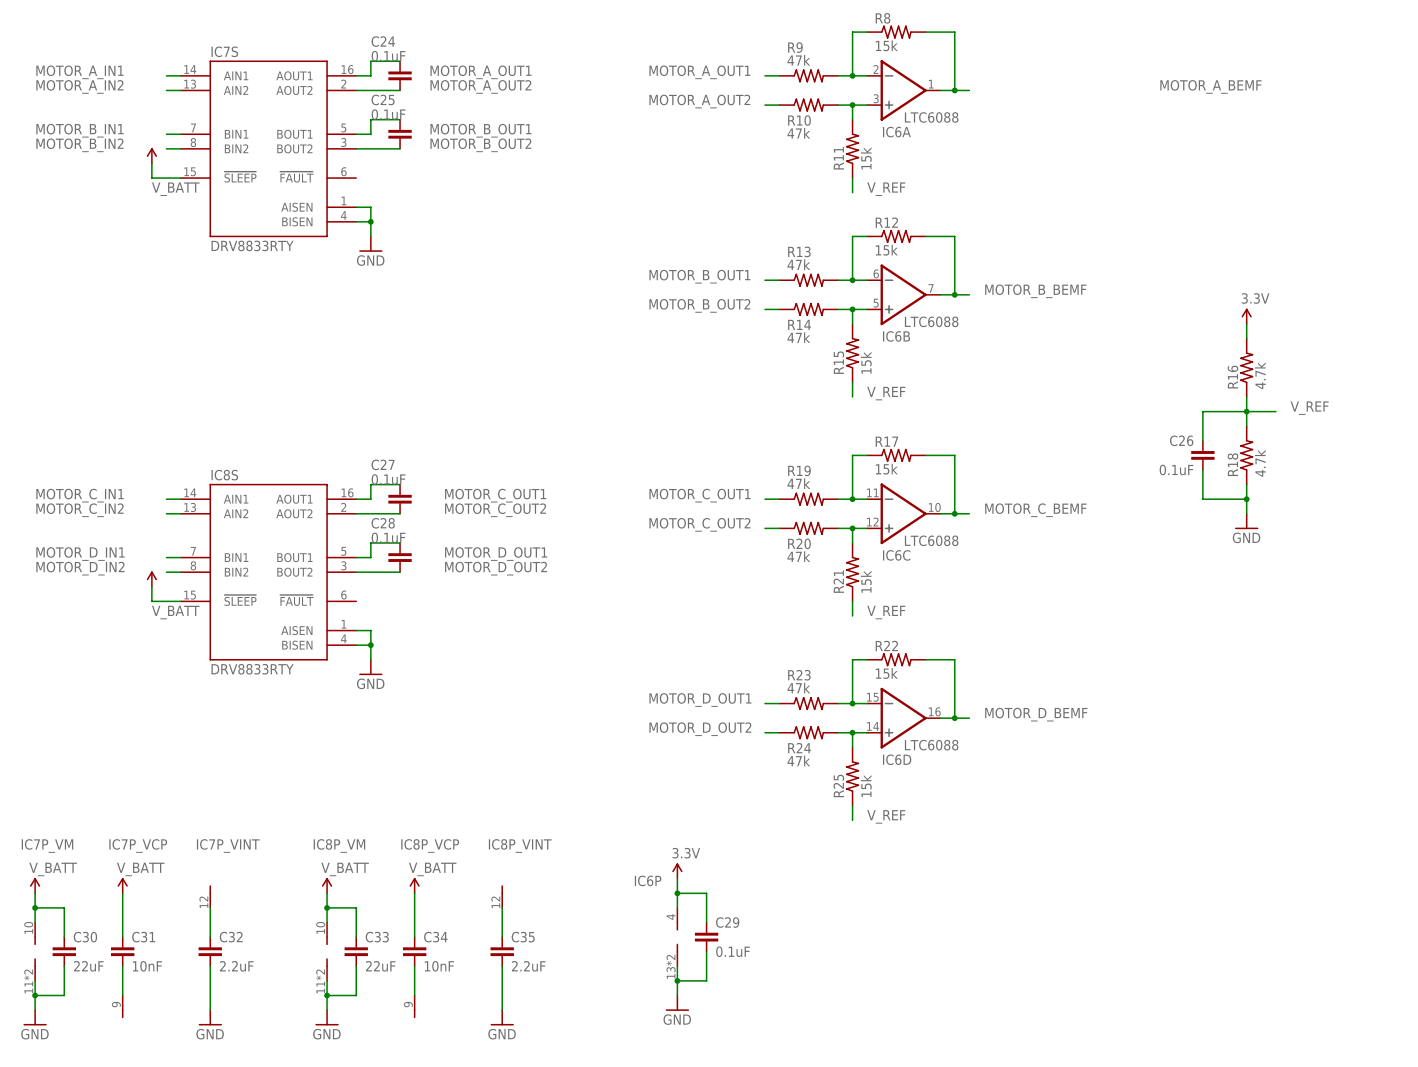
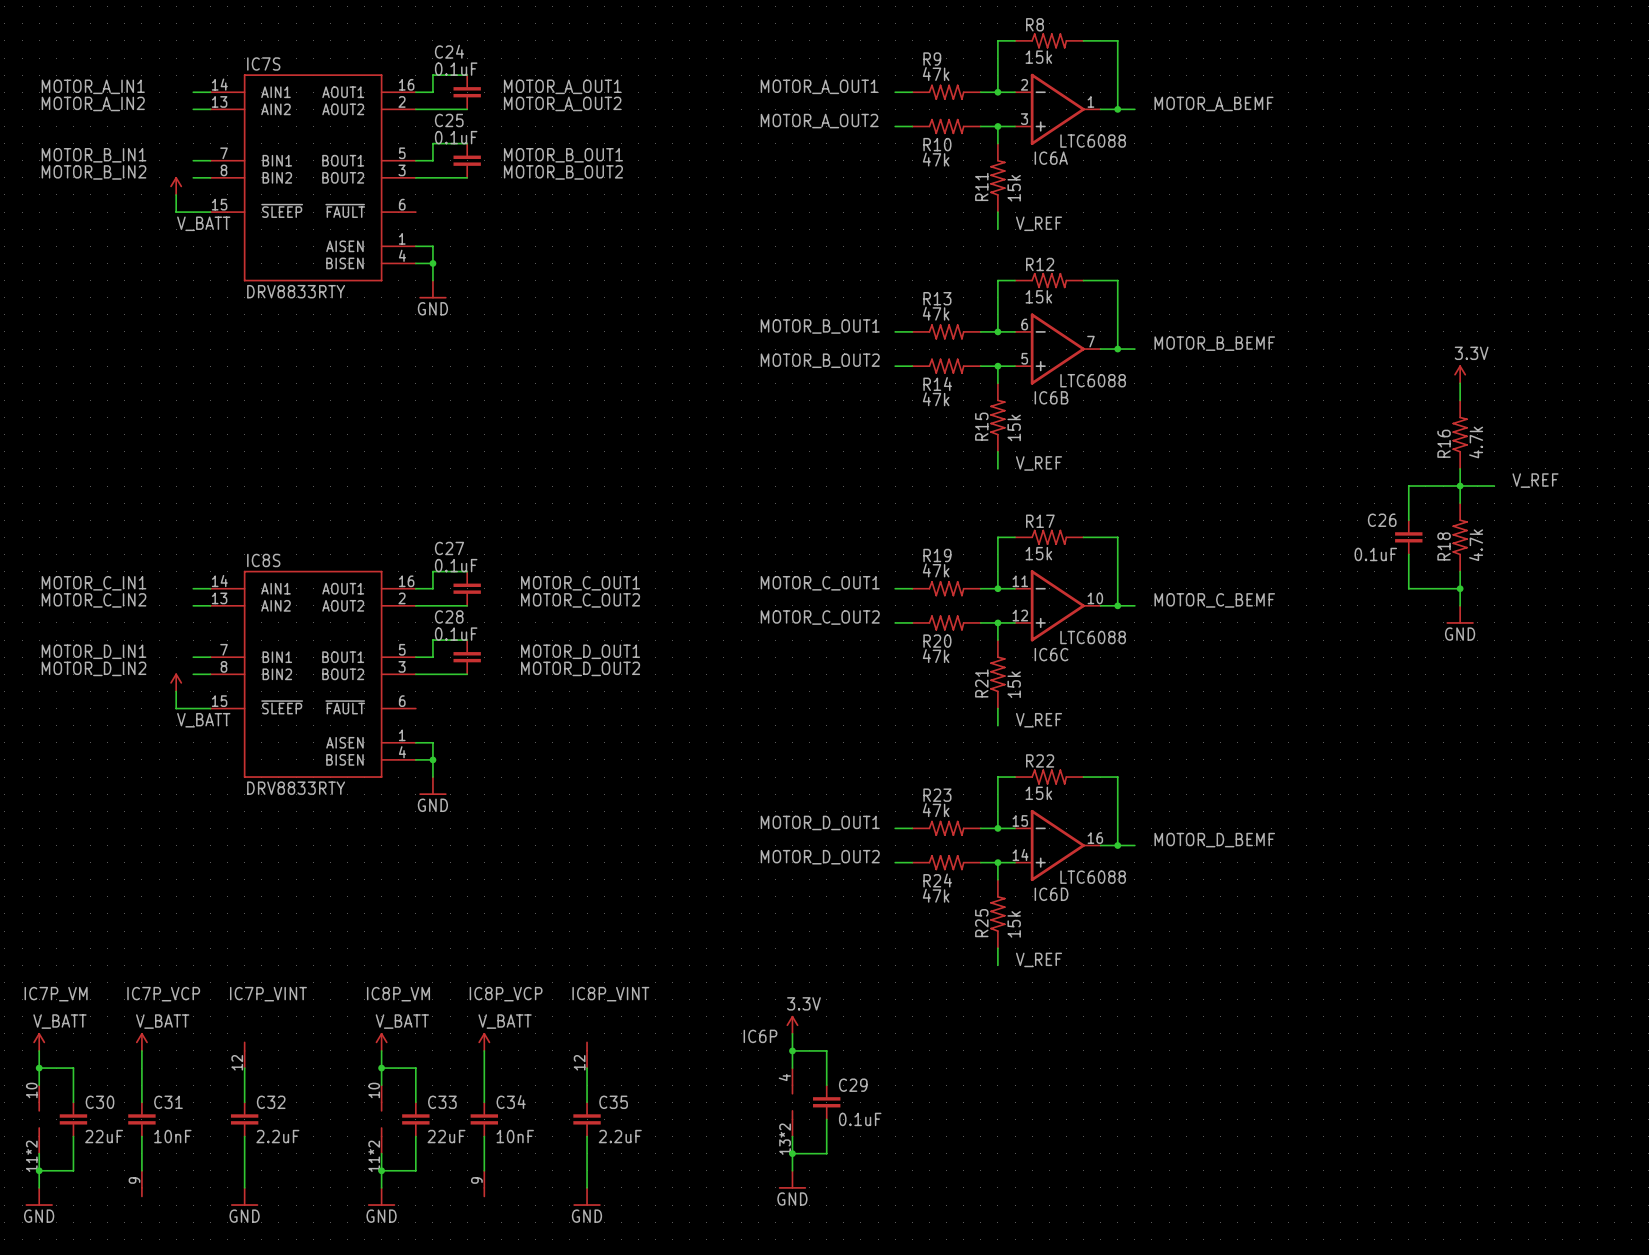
label: none -> MOTOR_A_BEMF (1213, 103)
label: MOTOR_A_BEMF (1210, 86) -> none

